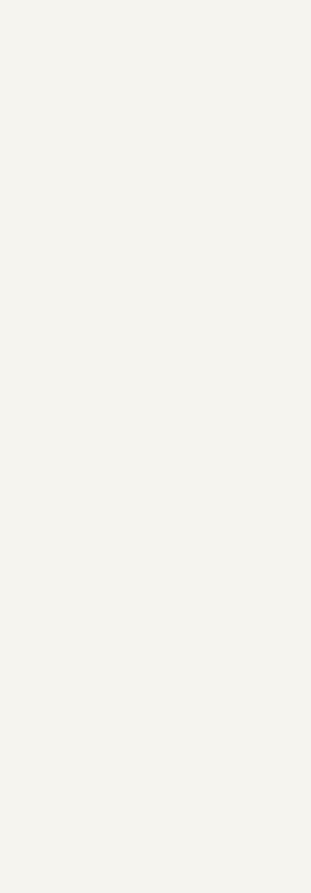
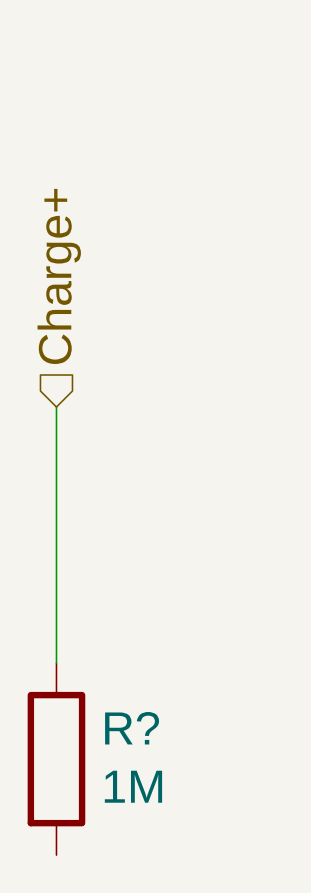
hierarchical label: none -> Charge+ (59, 276)
wire: none -> (56, 407) (56, 663)
R?: none -> 1M (56, 759)

